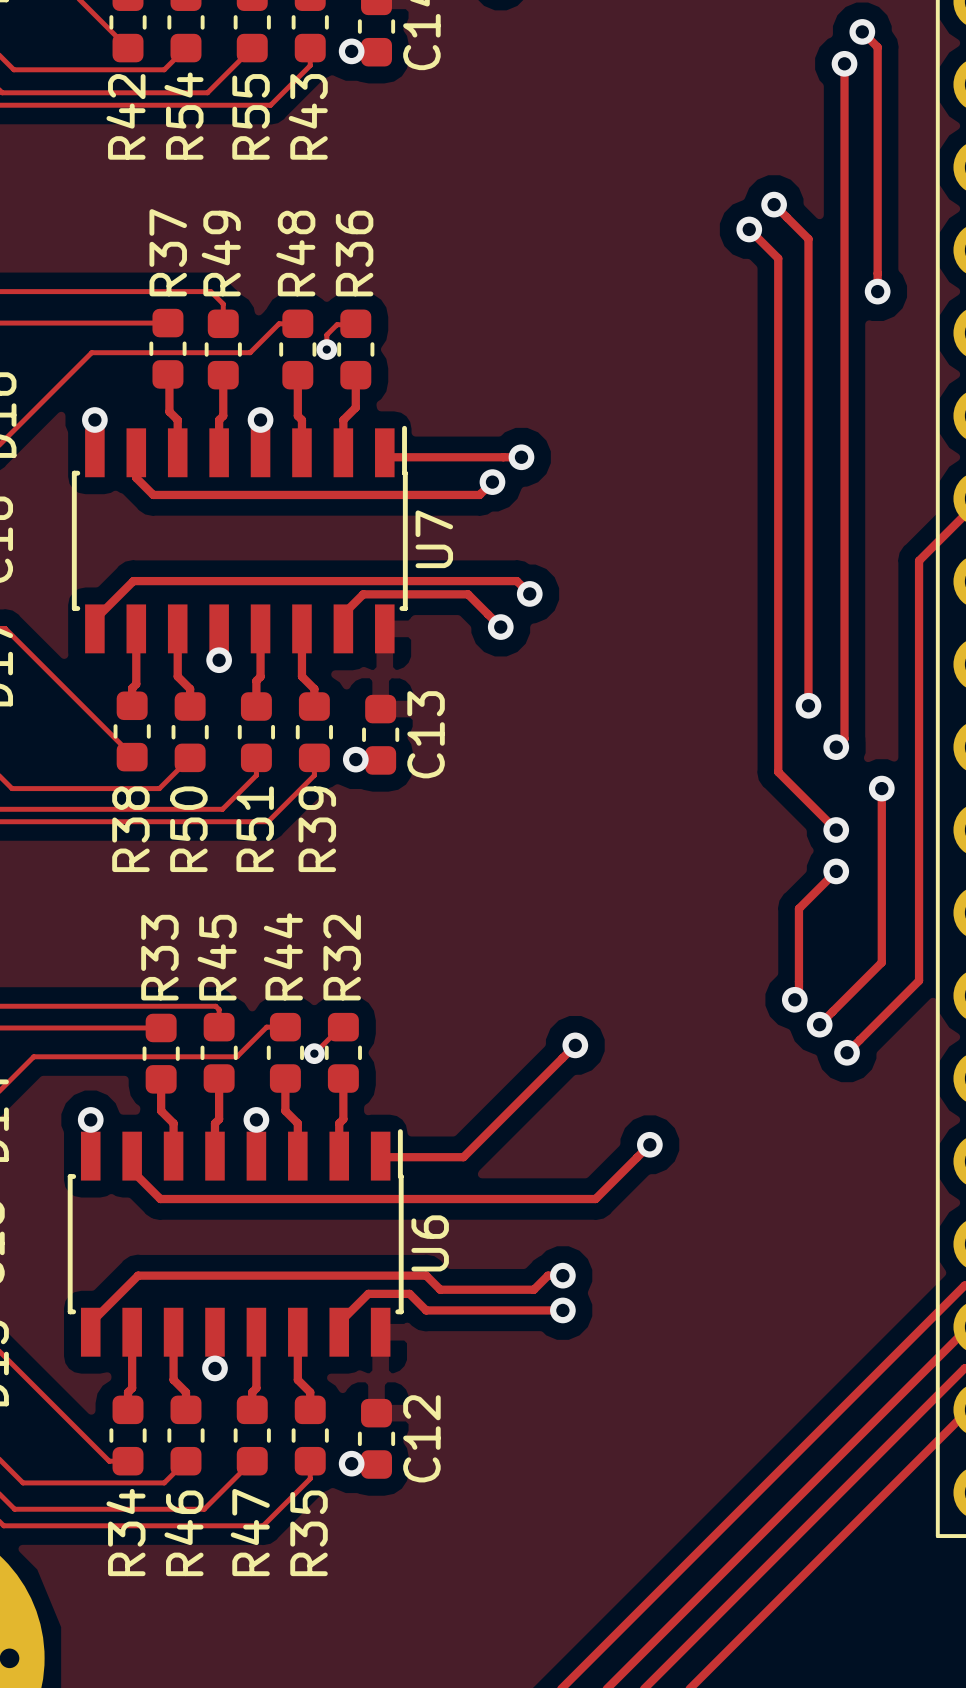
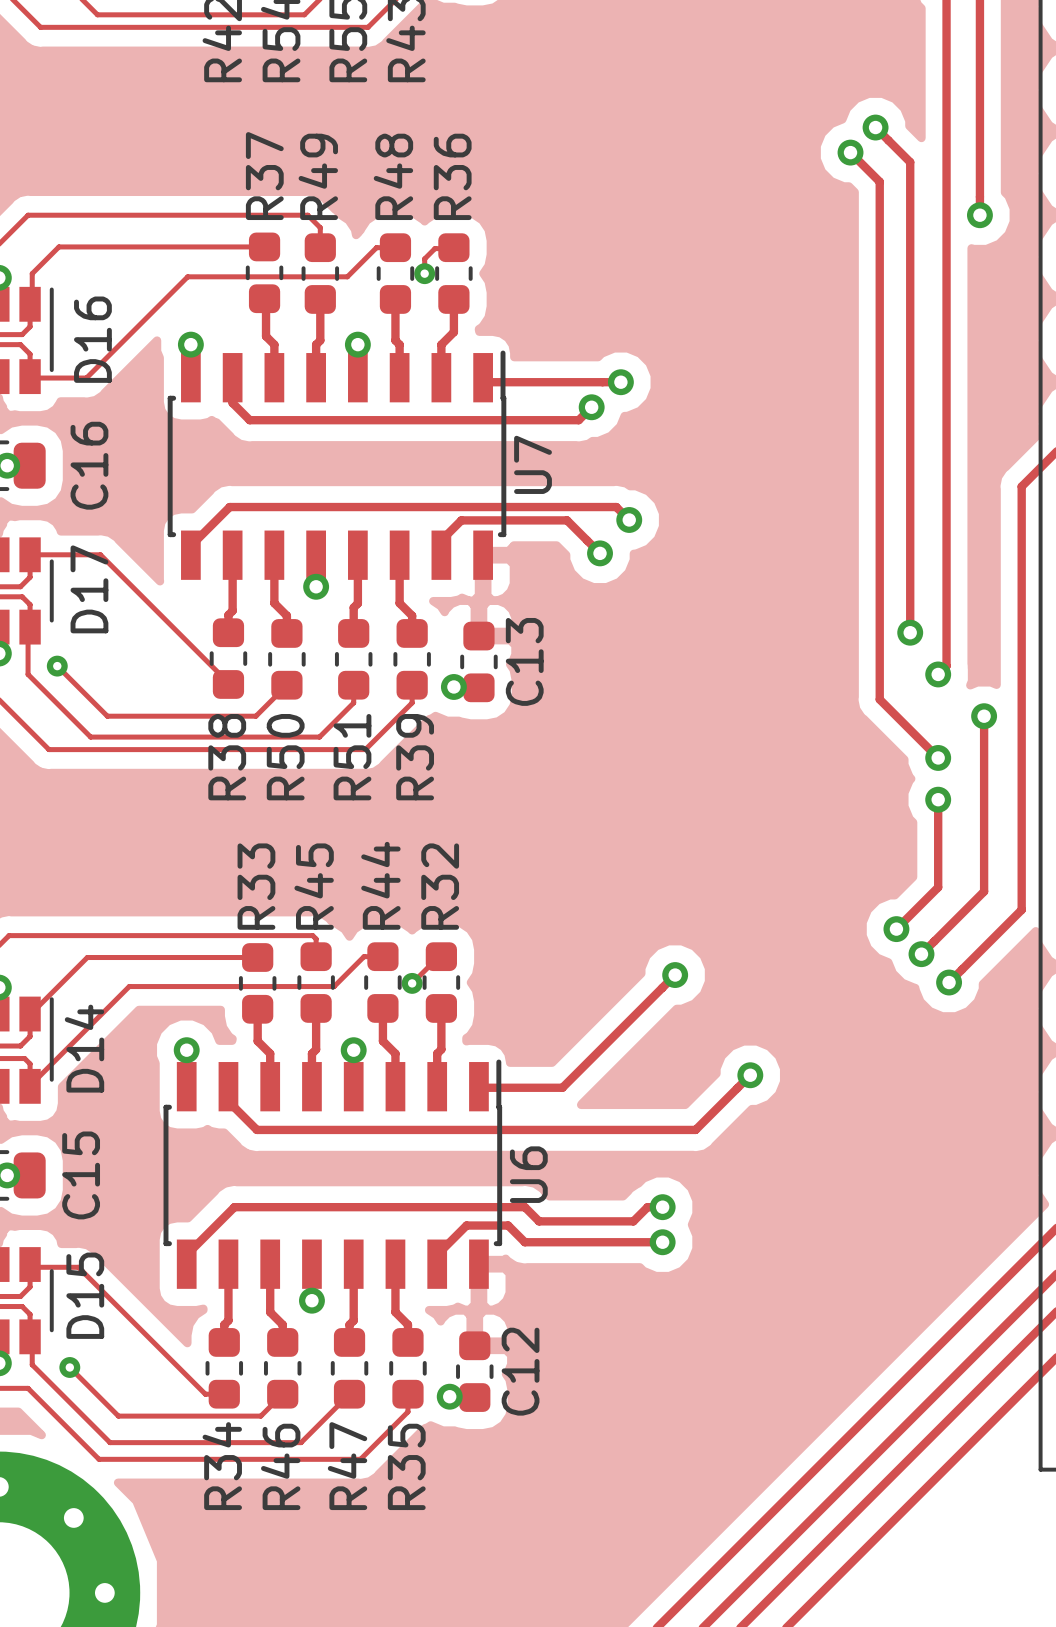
track: (836, 871) (798, 908) (798, 999) -> (938, 799) (938, 887) (896, 929)

